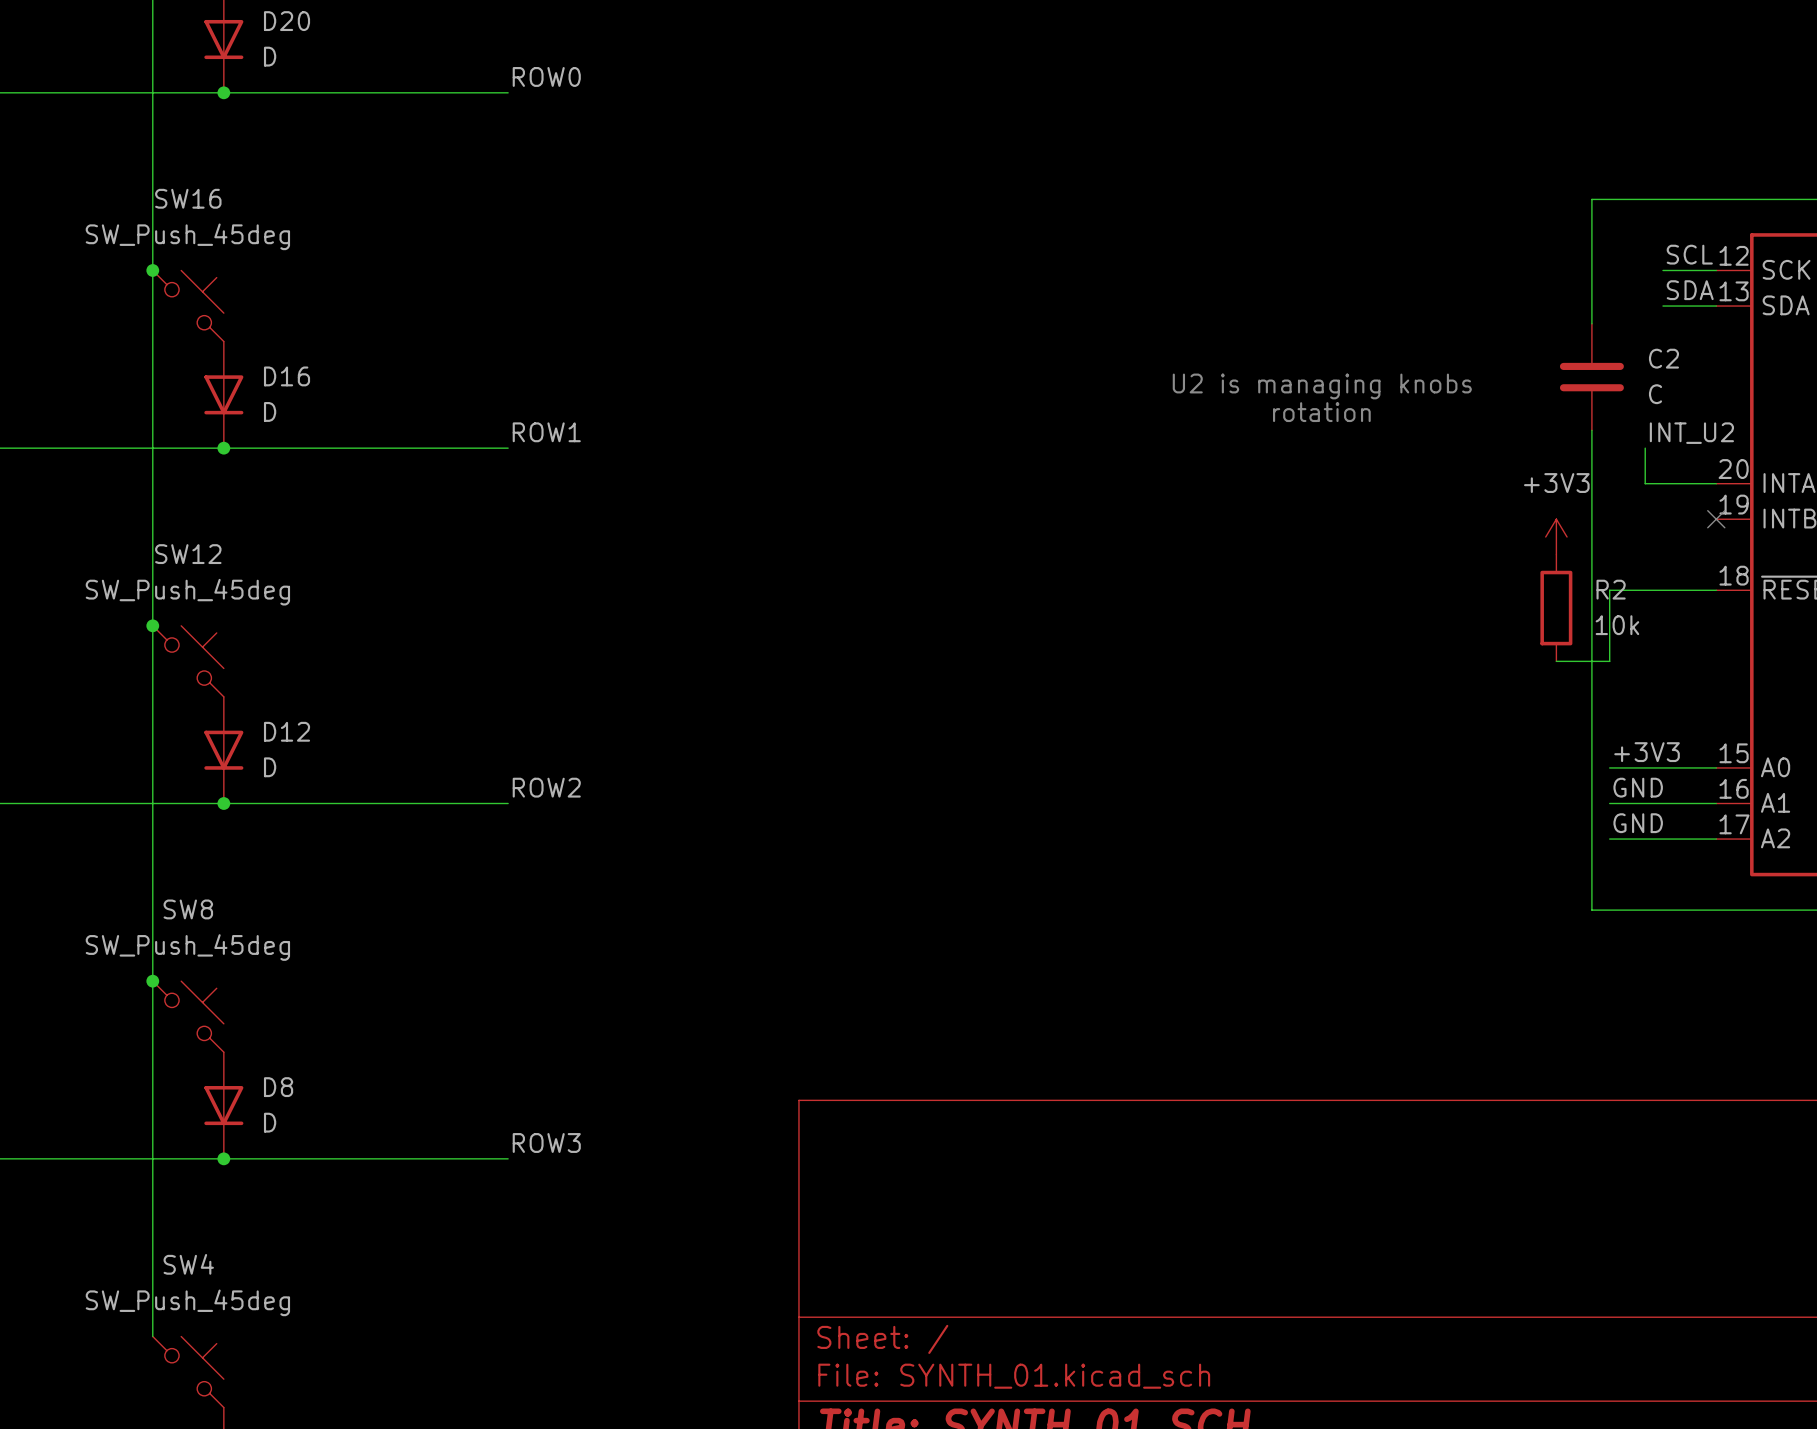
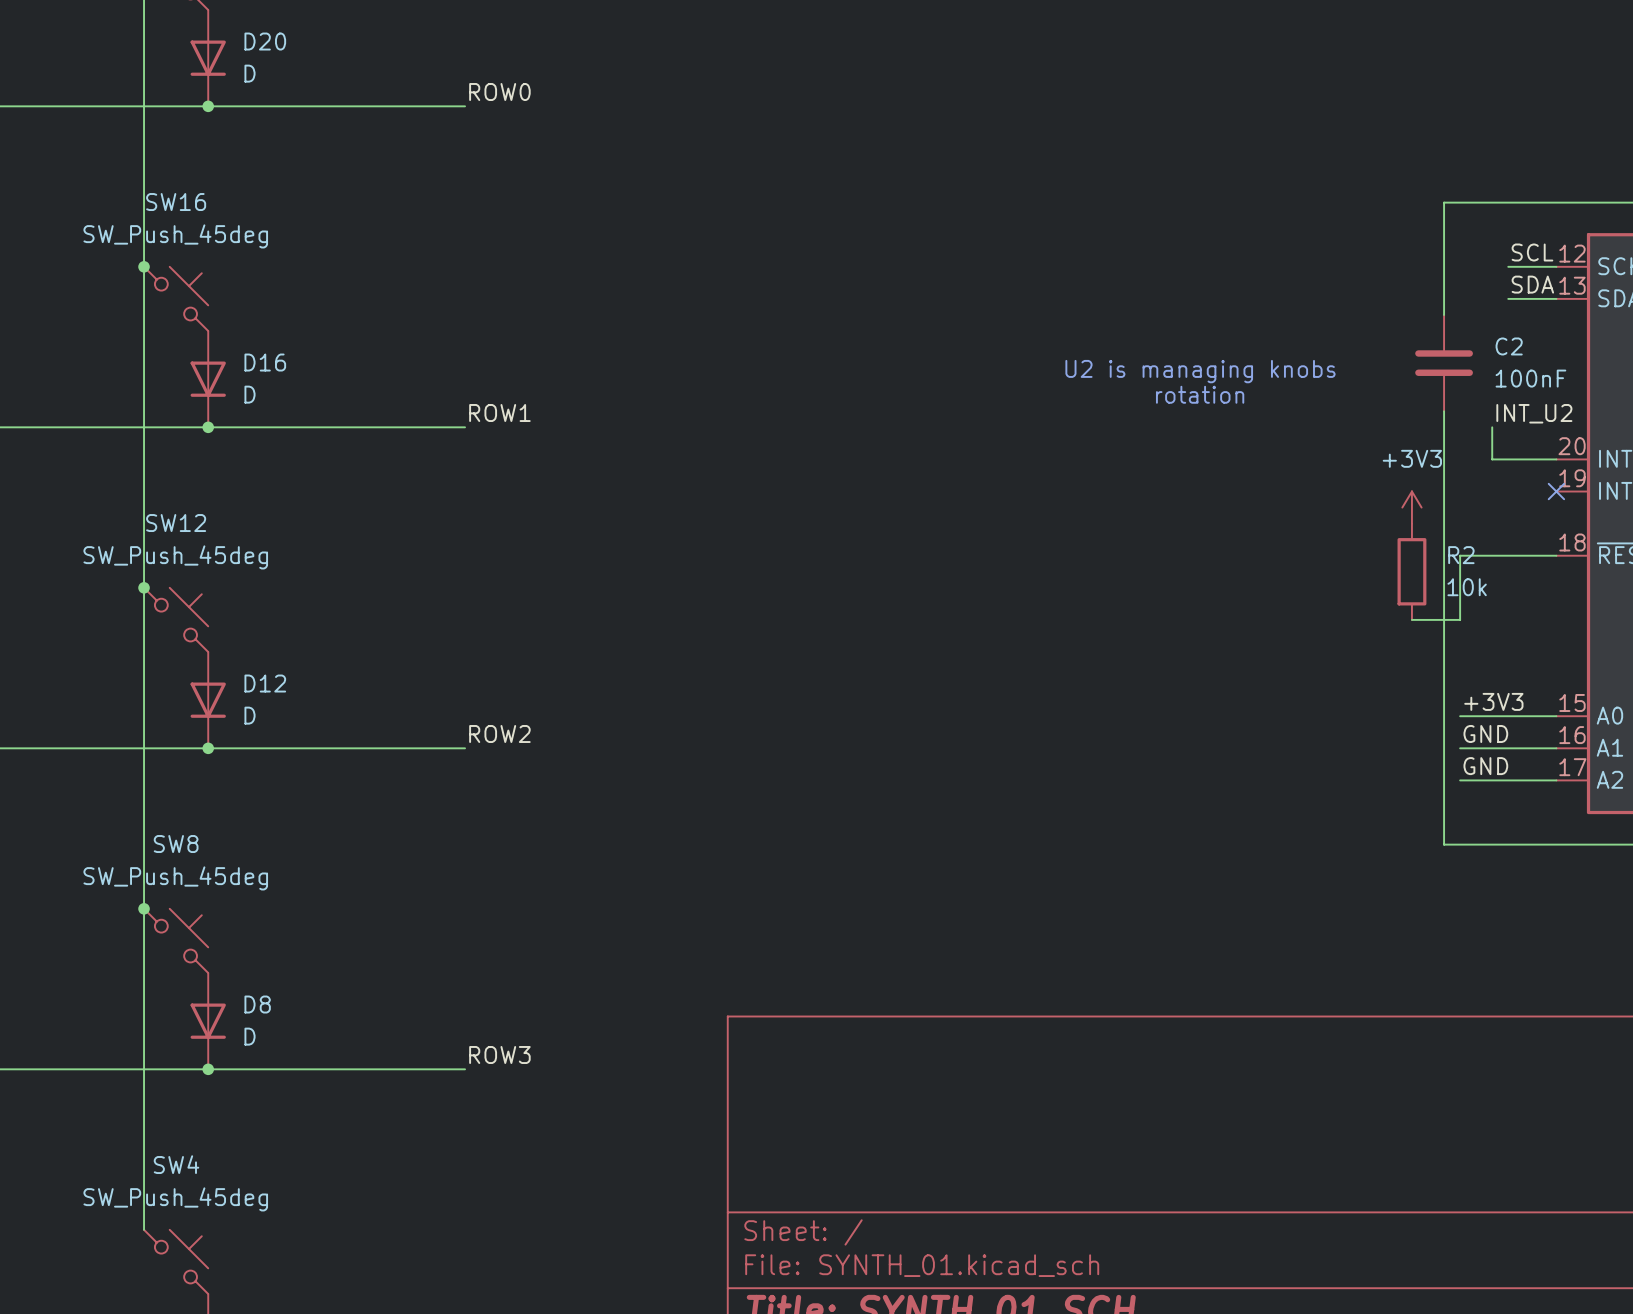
C2 value: C (1655, 394) -> 100nF (1530, 378)

